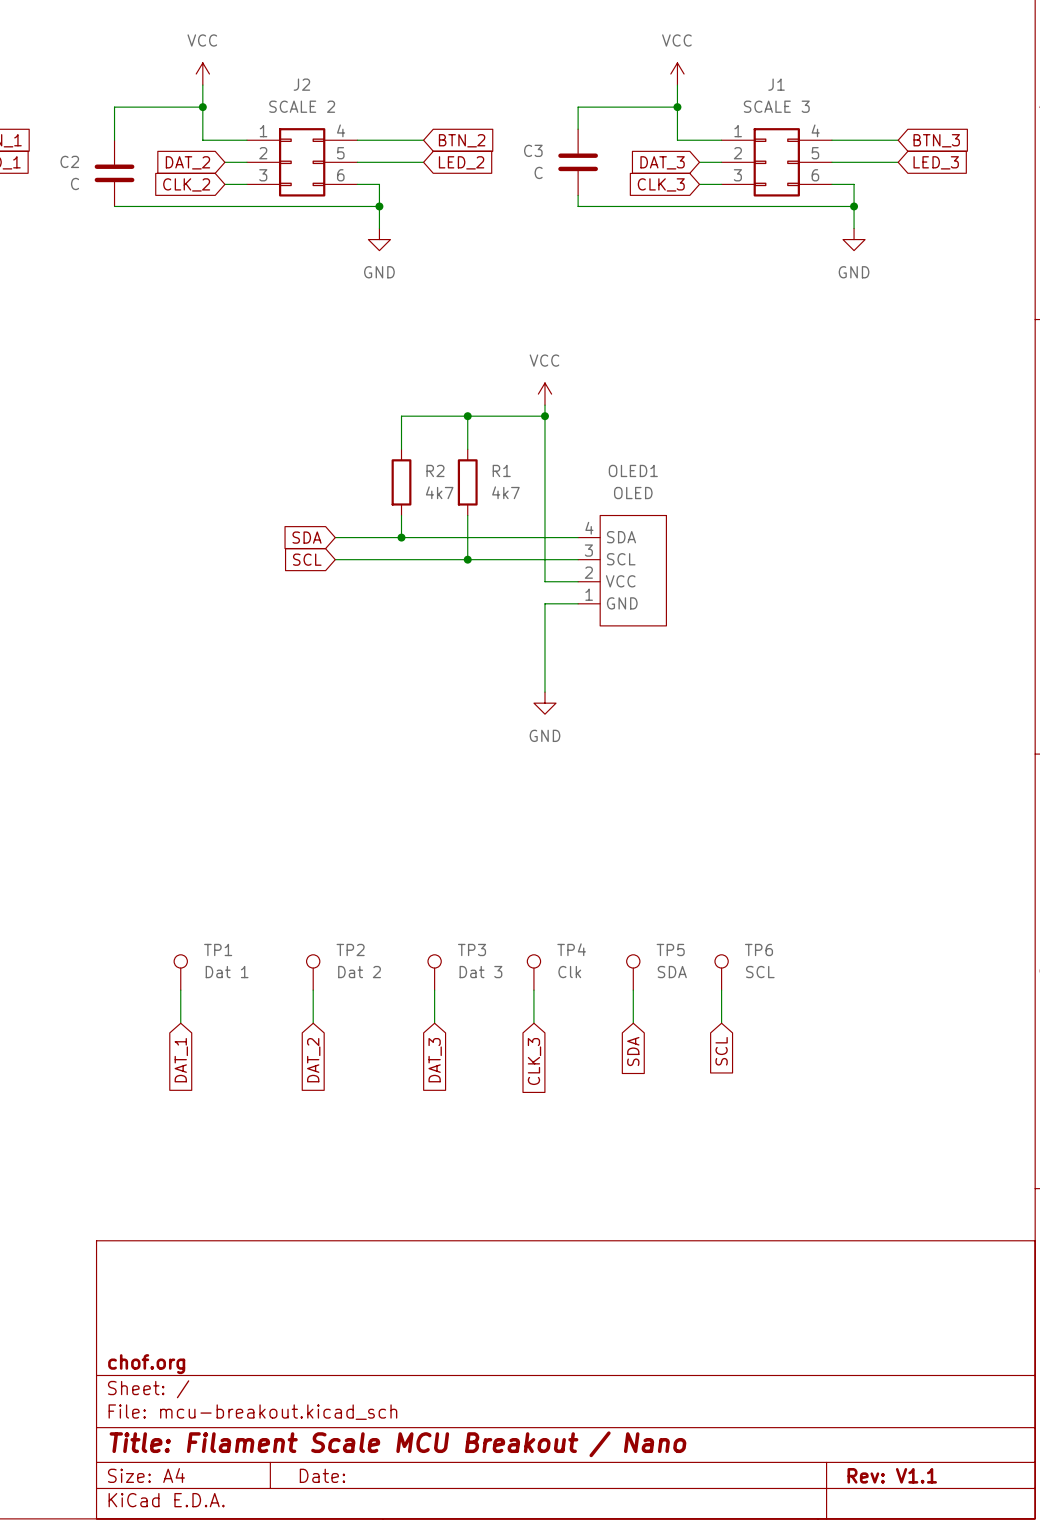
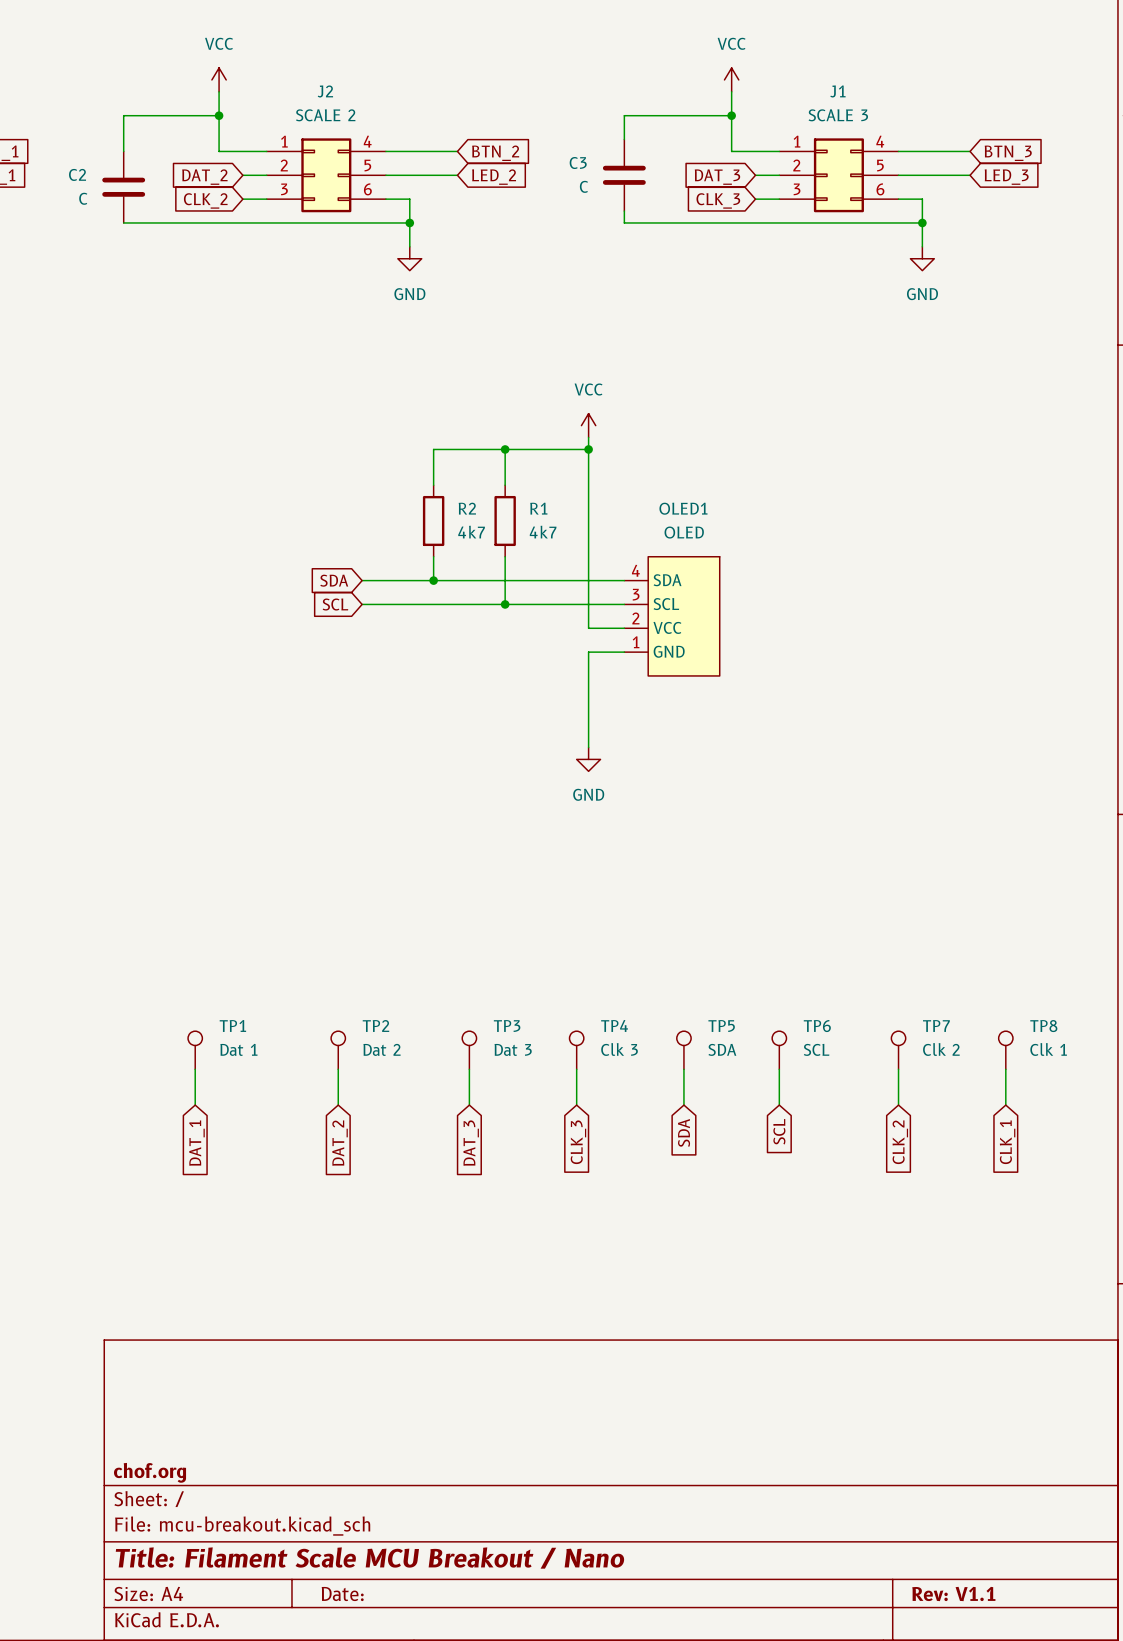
TP4 value: Clk (569, 972) -> Clk 3 (619, 1049)
TP7: none -> Clk 2 (898, 1050)
TP8: none -> Clk 1 (1005, 1050)
wire: none -> (898, 1069) (898, 1105)
wire: none -> (1005, 1069) (1005, 1105)
global label: none -> CLK_2 (900, 1142)
global label: none -> CLK_1 (1007, 1142)

